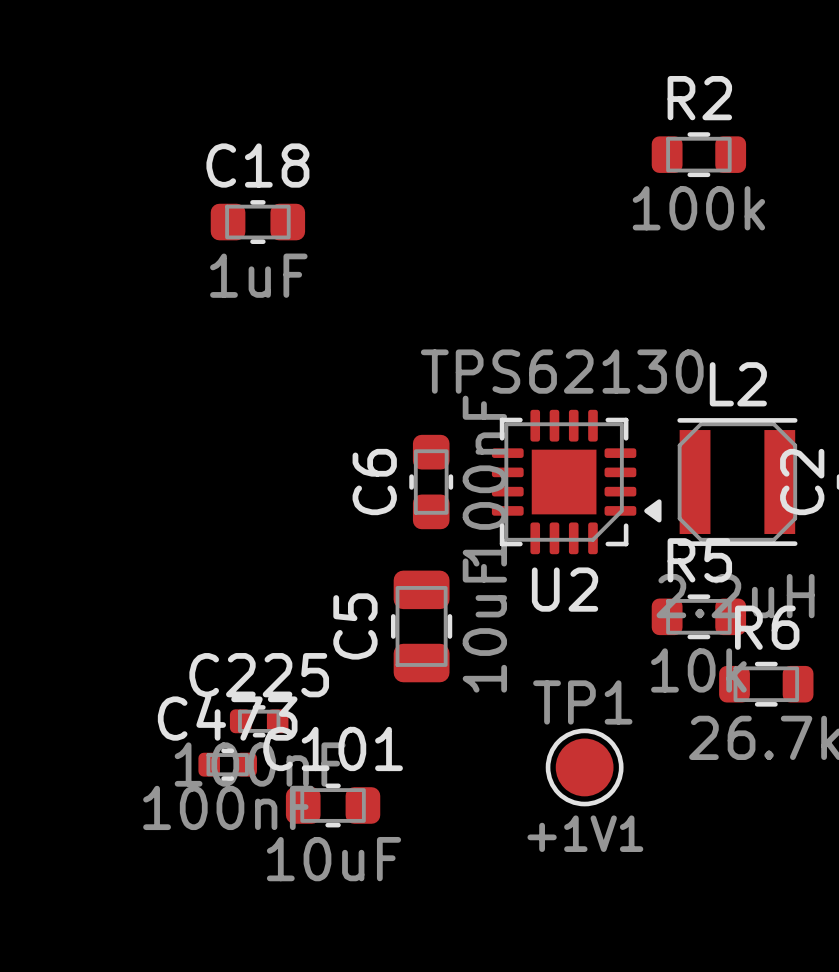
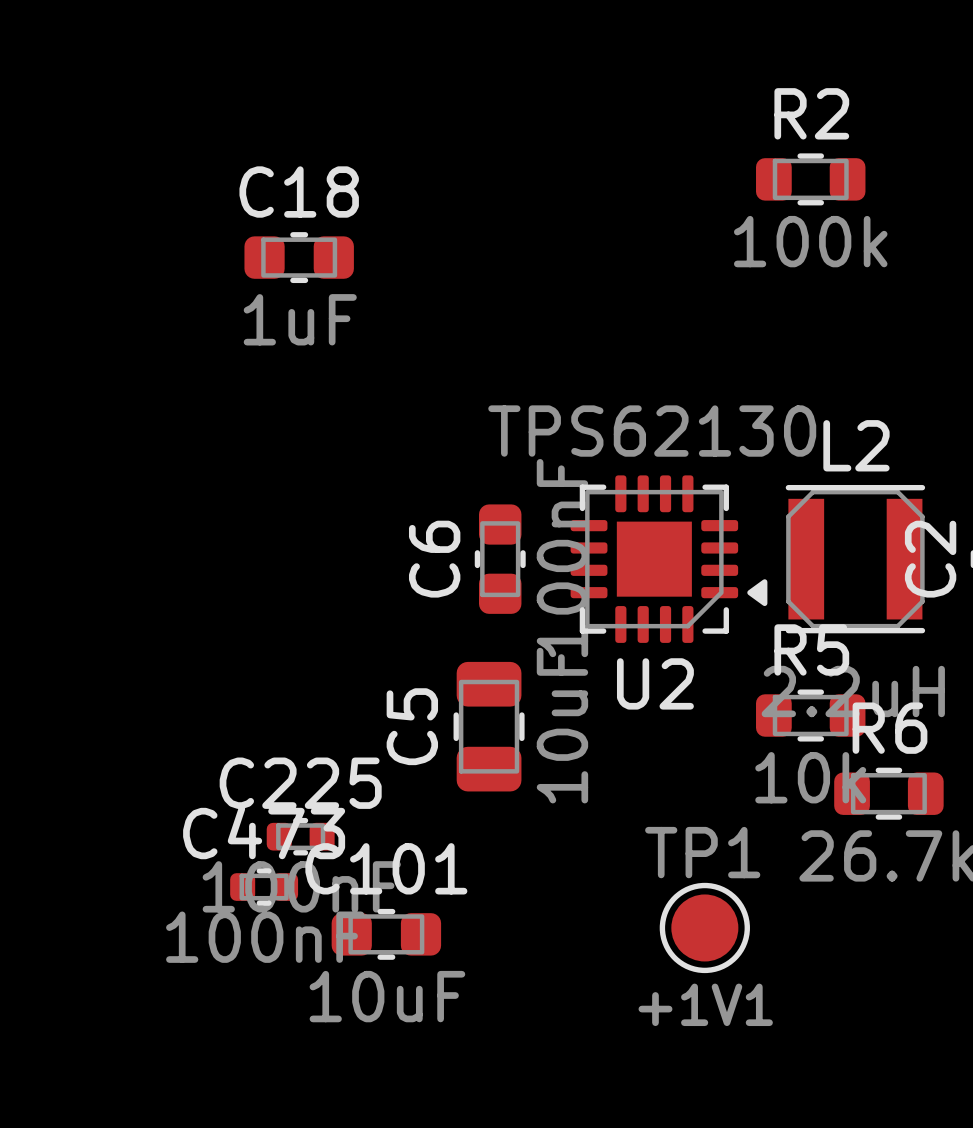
TP1 position: (584, 767) -> (704, 927)

